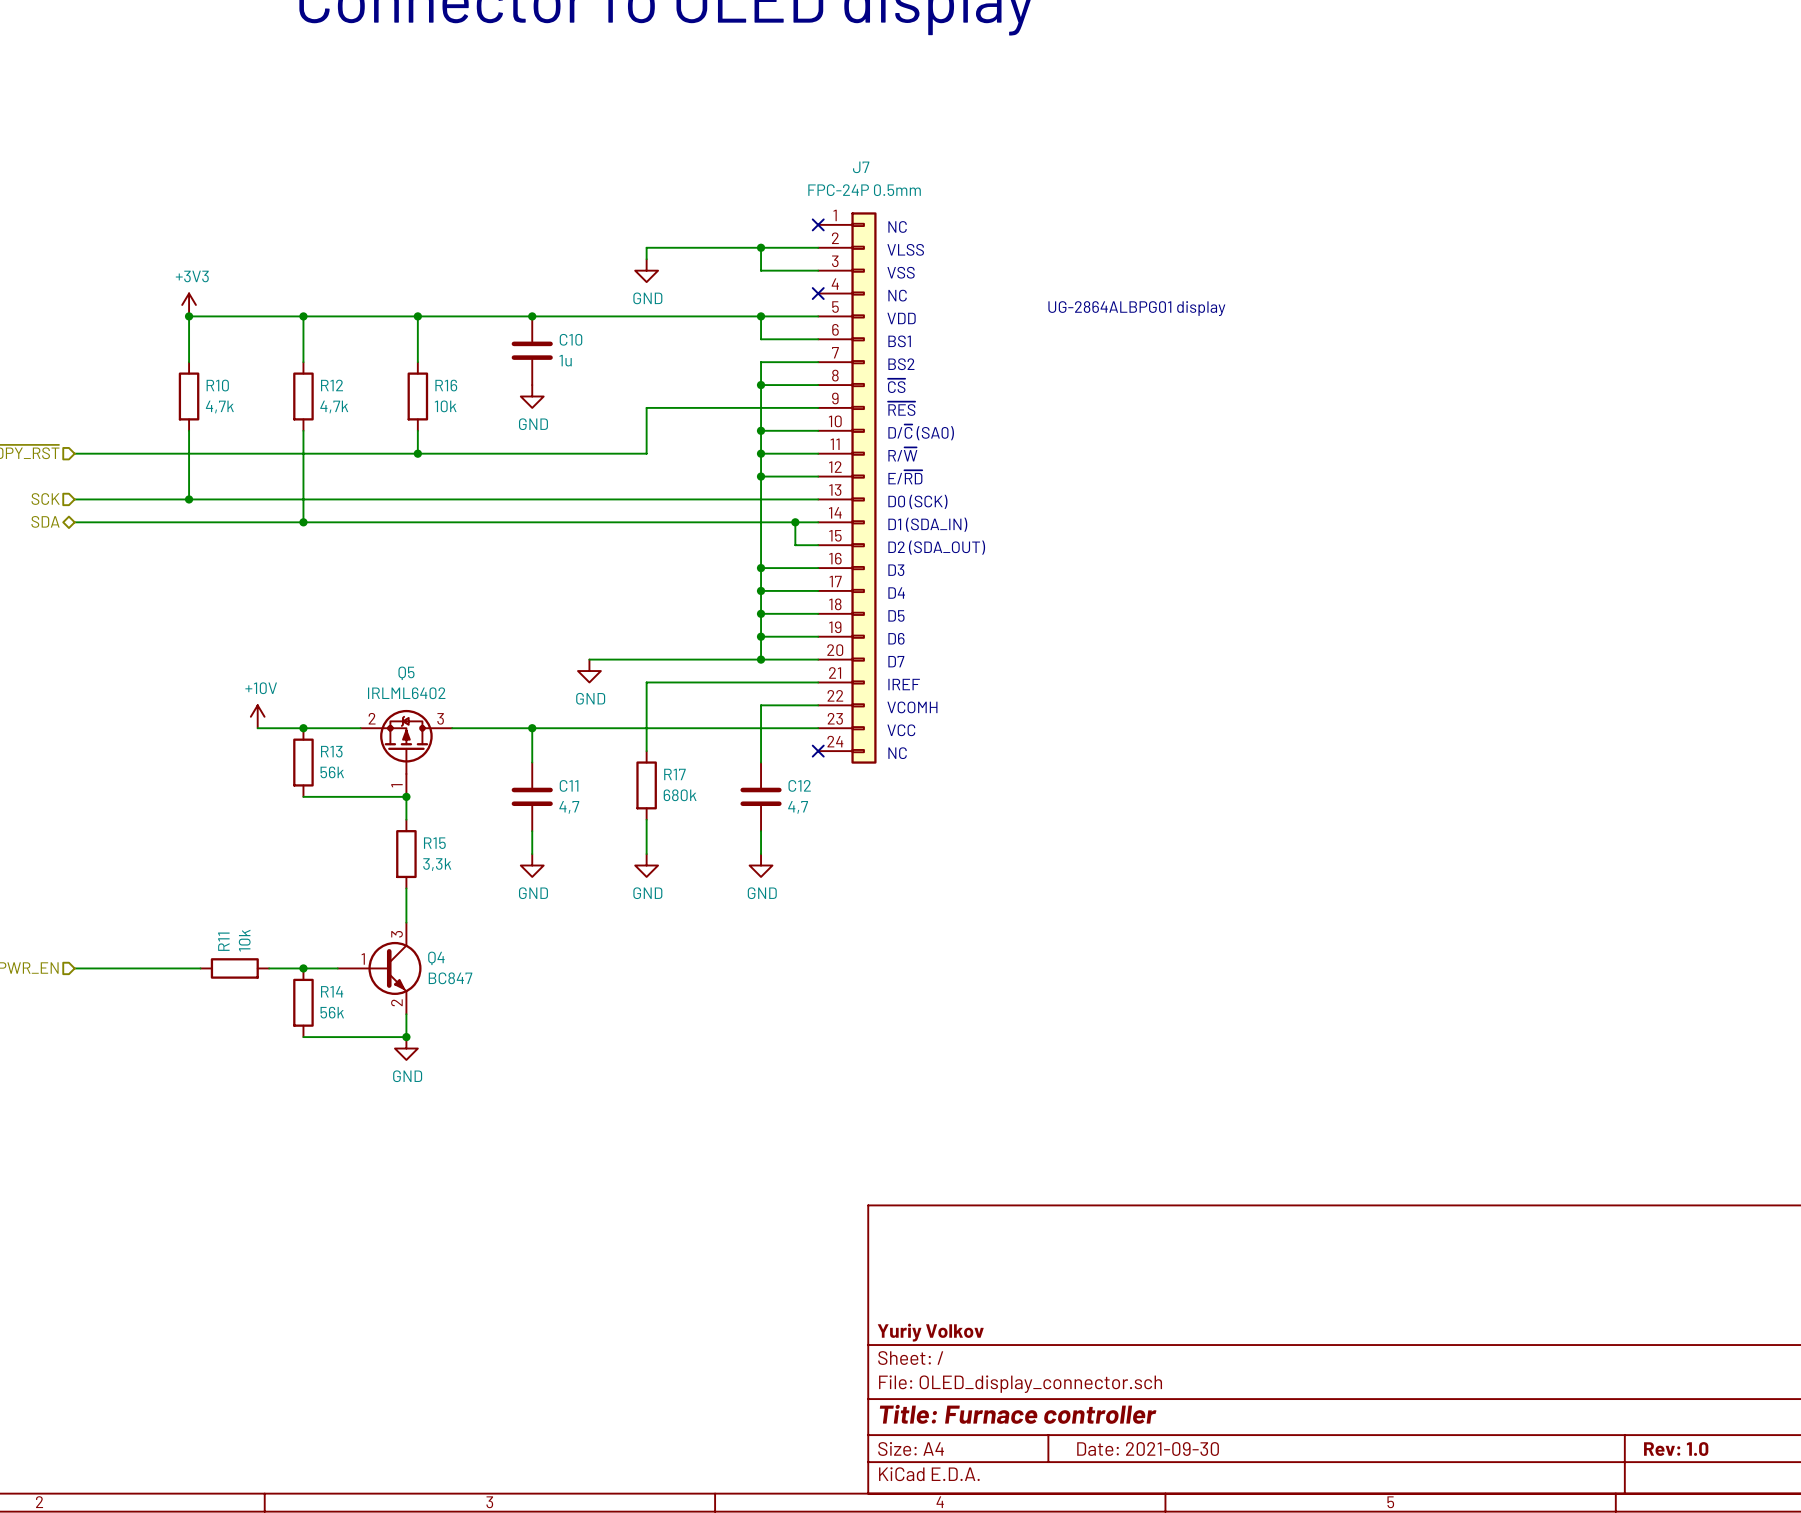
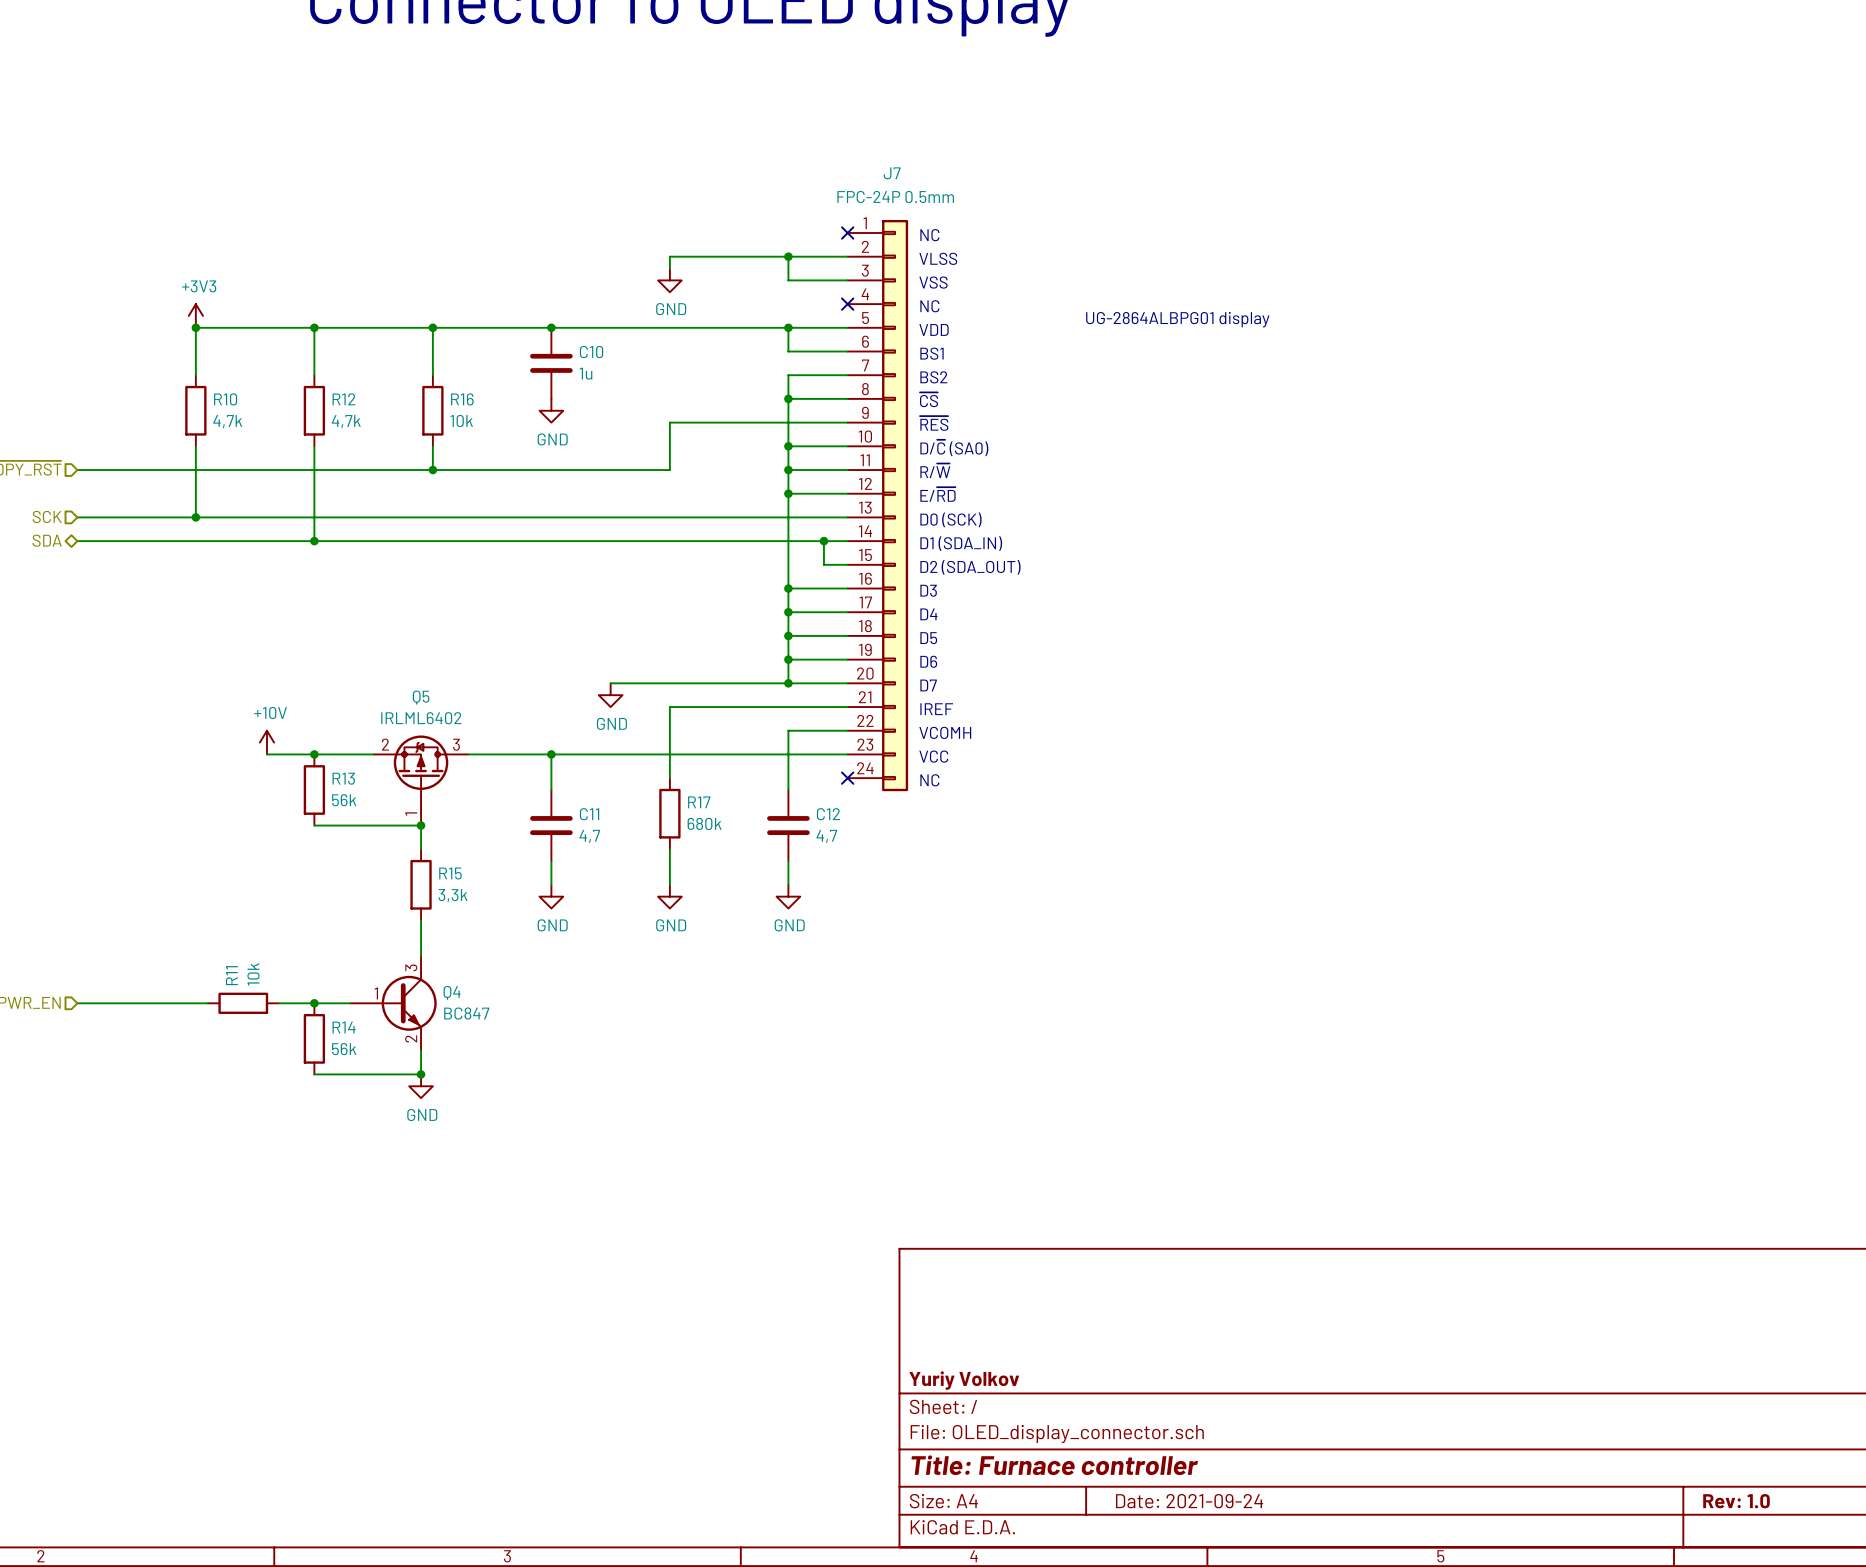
title block: Date: 2021-09-30 (1148, 1449) -> Date: 2021-09-24 (1189, 1501)

